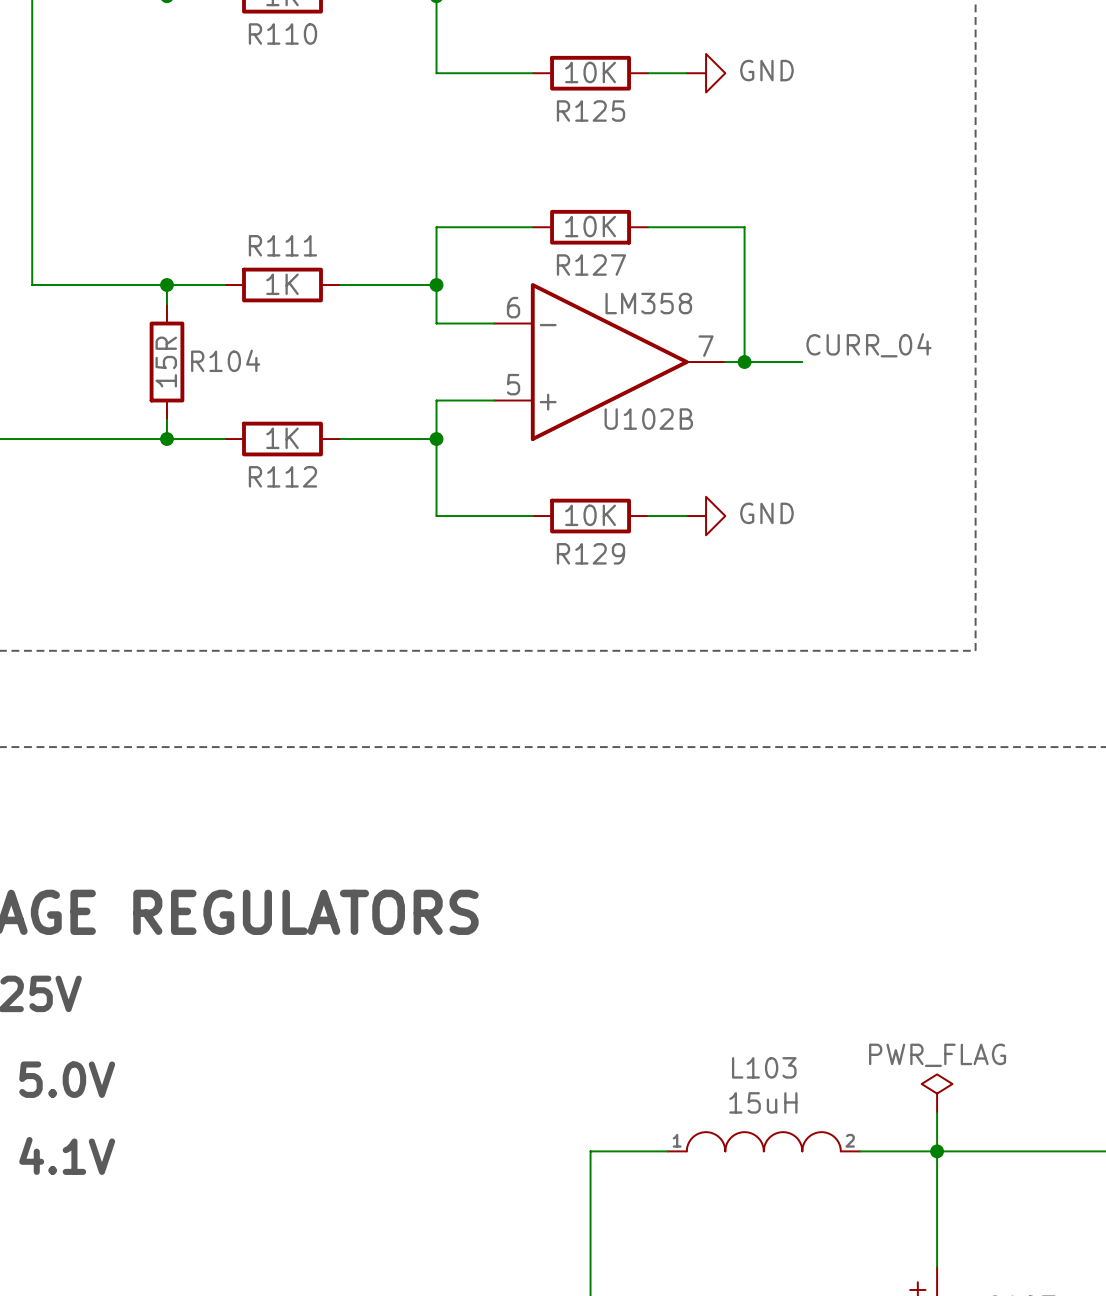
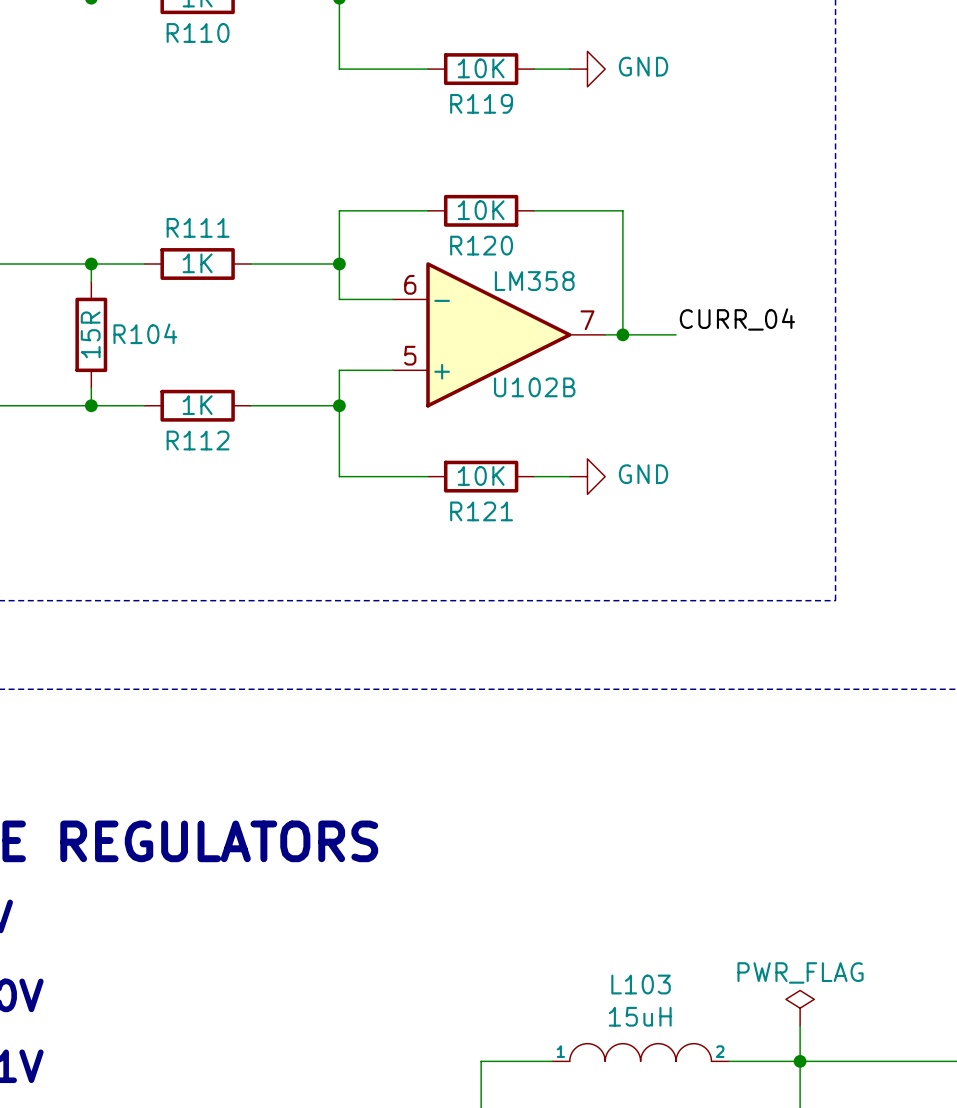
R125 name: R125 (591, 111) -> R119 (481, 103)
R127 name: R127 (591, 265) -> R120 (481, 245)
R129 name: R129 (591, 553) -> R121 (481, 511)

